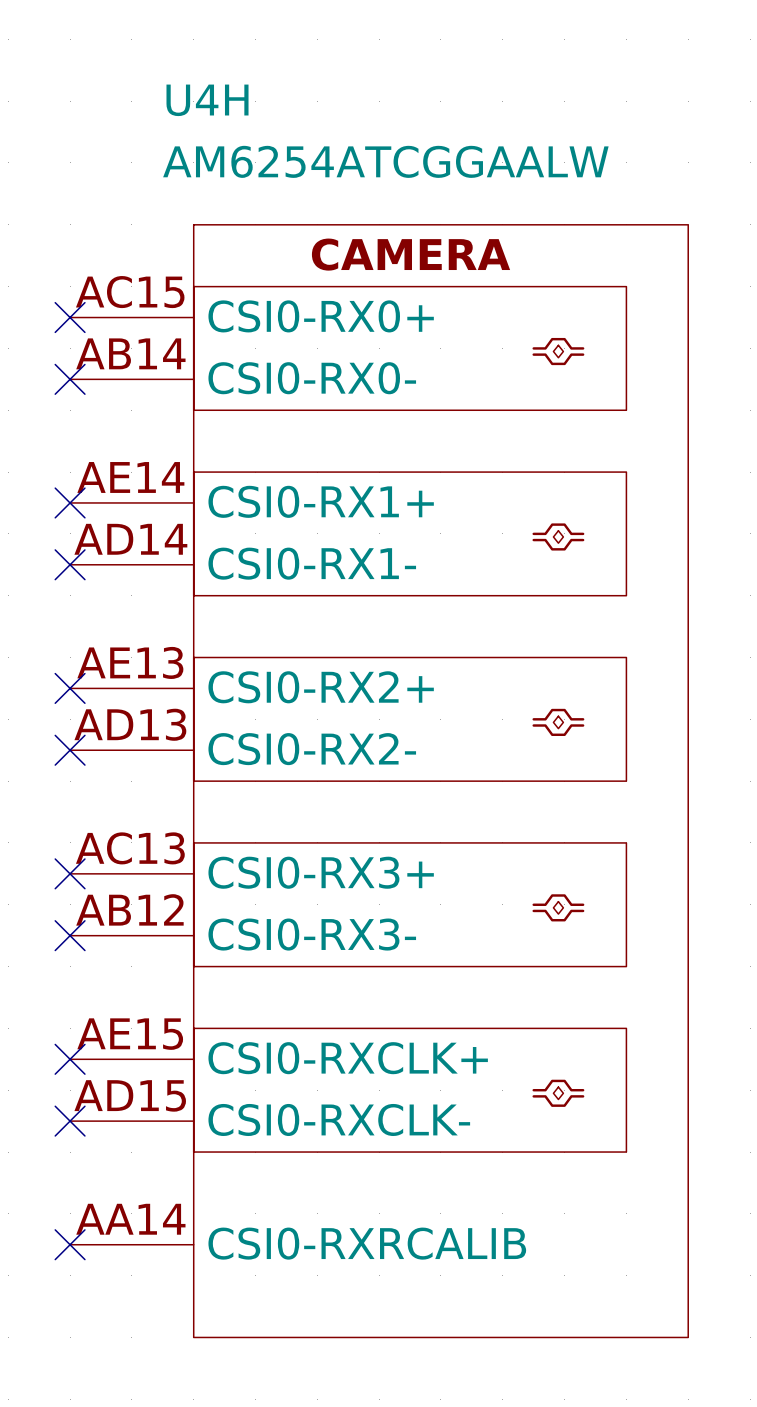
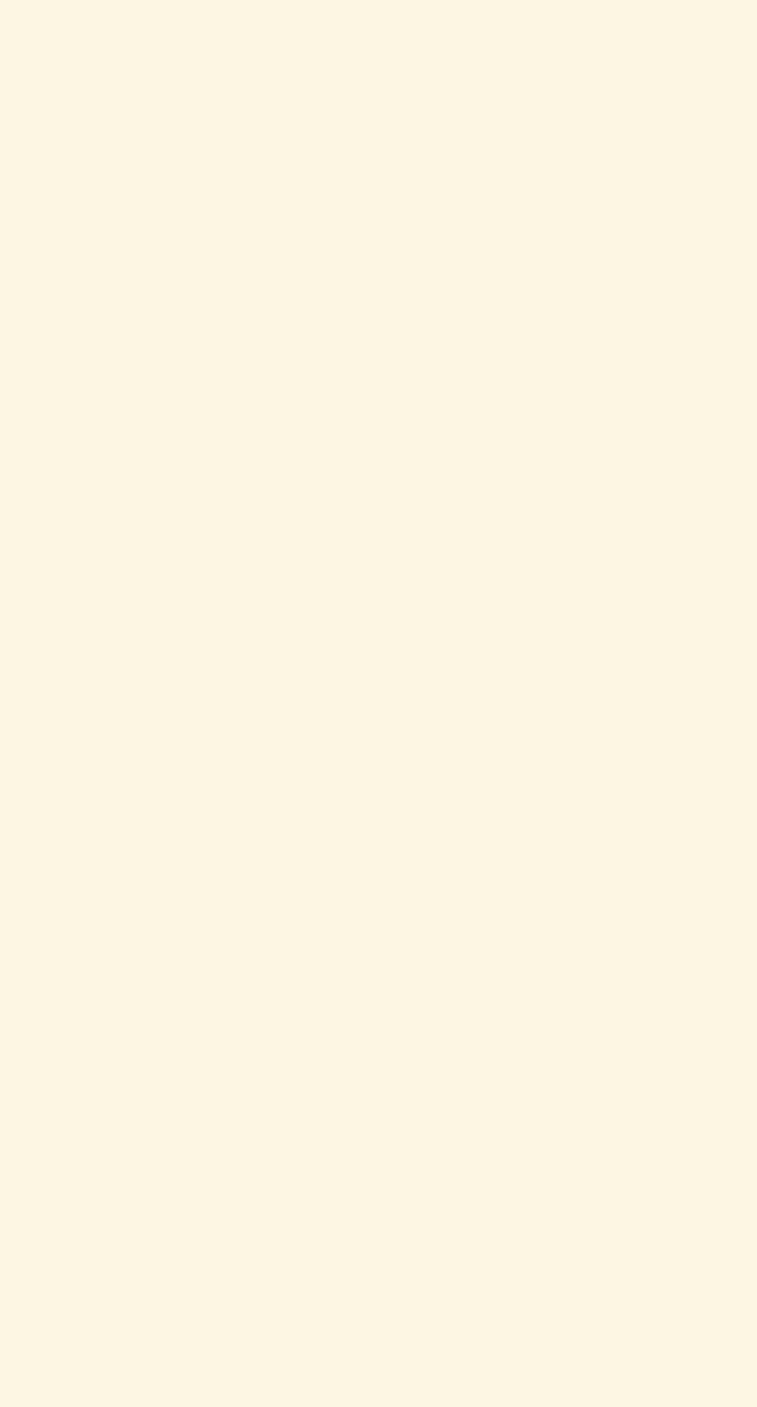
no-connect mark: (70, 317) -> none
no-connect mark: (70, 379) -> none
no-connect mark: (70, 502) -> none
no-connect mark: (70, 564) -> none
no-connect mark: (70, 688) -> none
no-connect mark: (70, 750) -> none
U4H: AM6254ATCGGAALW (379, 781) -> none
no-connect mark: (70, 873) -> none
no-connect mark: (70, 935) -> none
no-connect mark: (70, 1059) -> none
no-connect mark: (70, 1121) -> none
no-connect mark: (70, 1244) -> none

